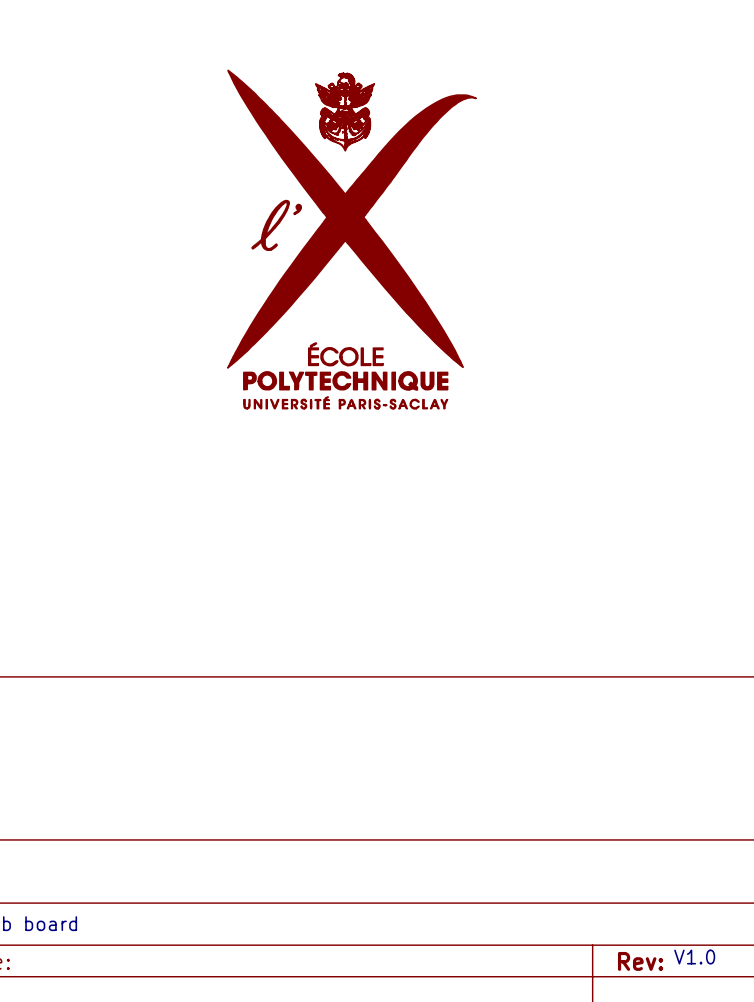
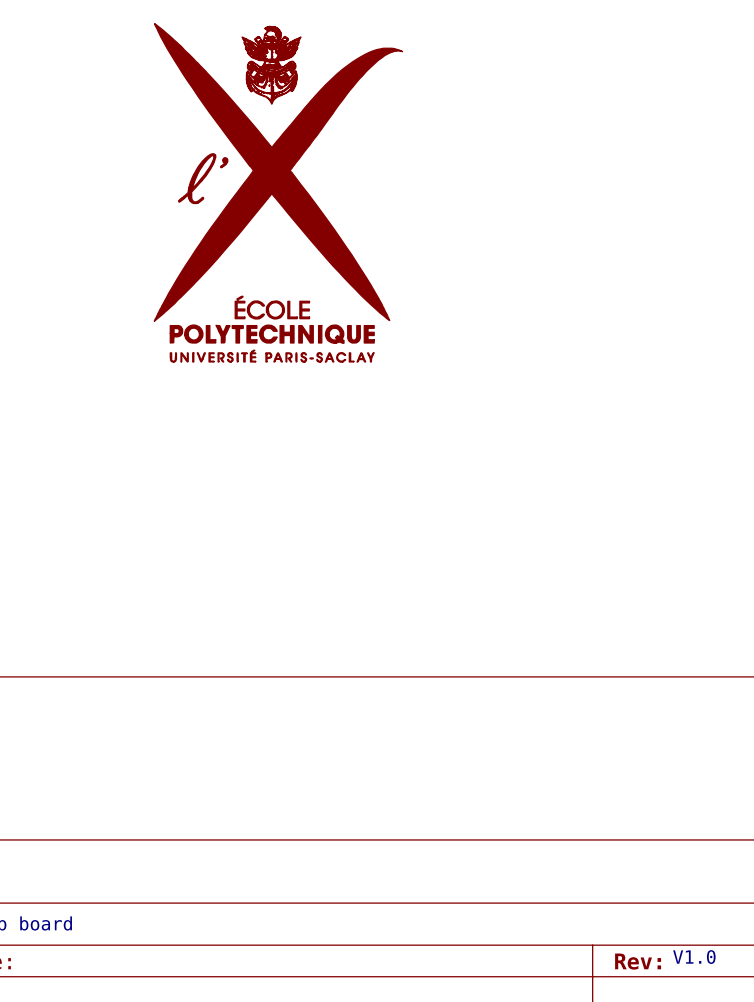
power symbol position: (351, 239) -> (278, 192)

